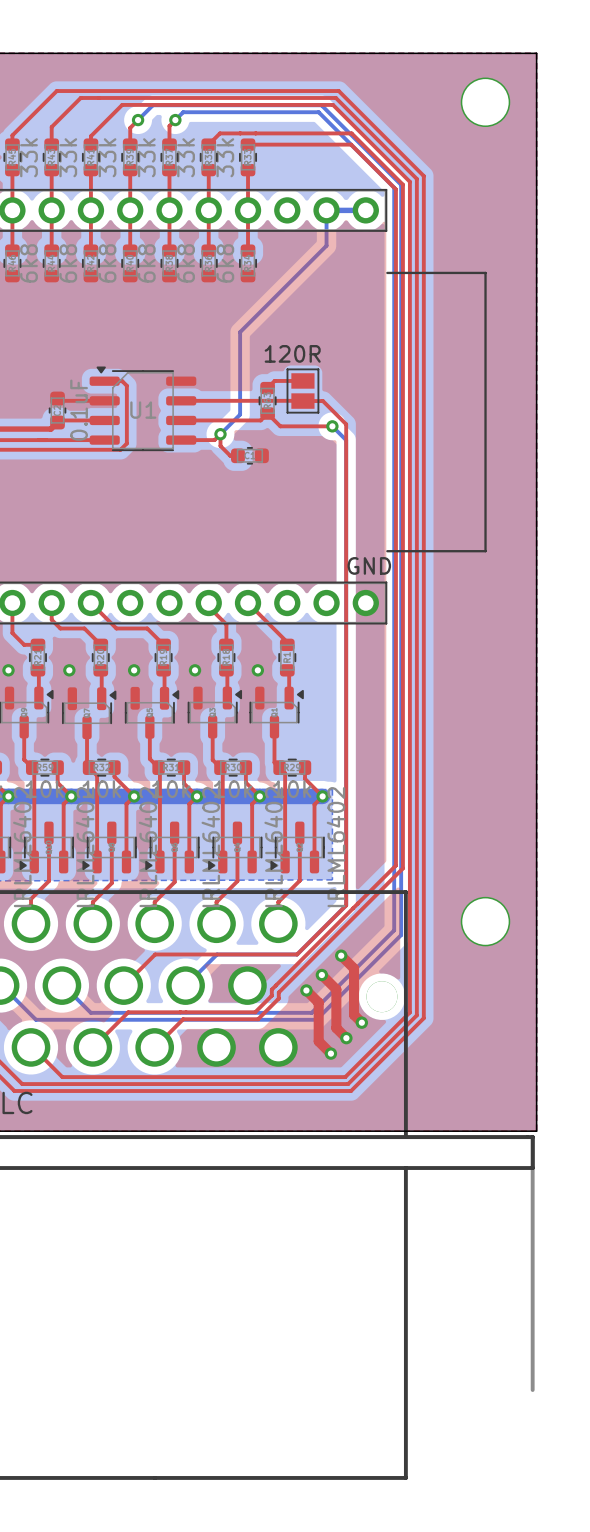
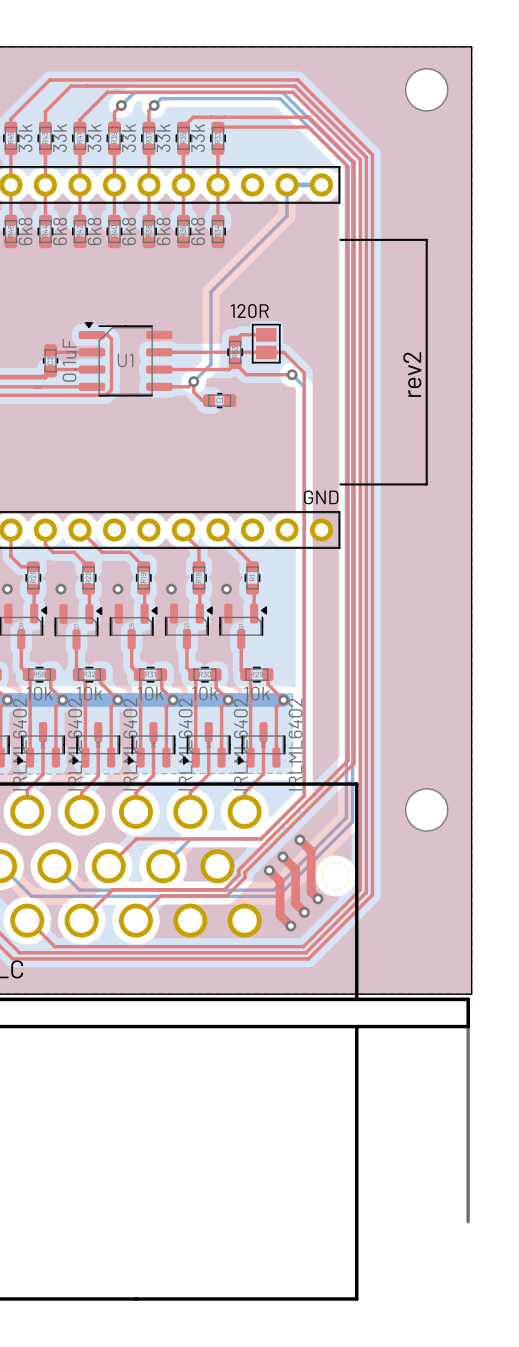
text: none -> rev2 (412, 374)

